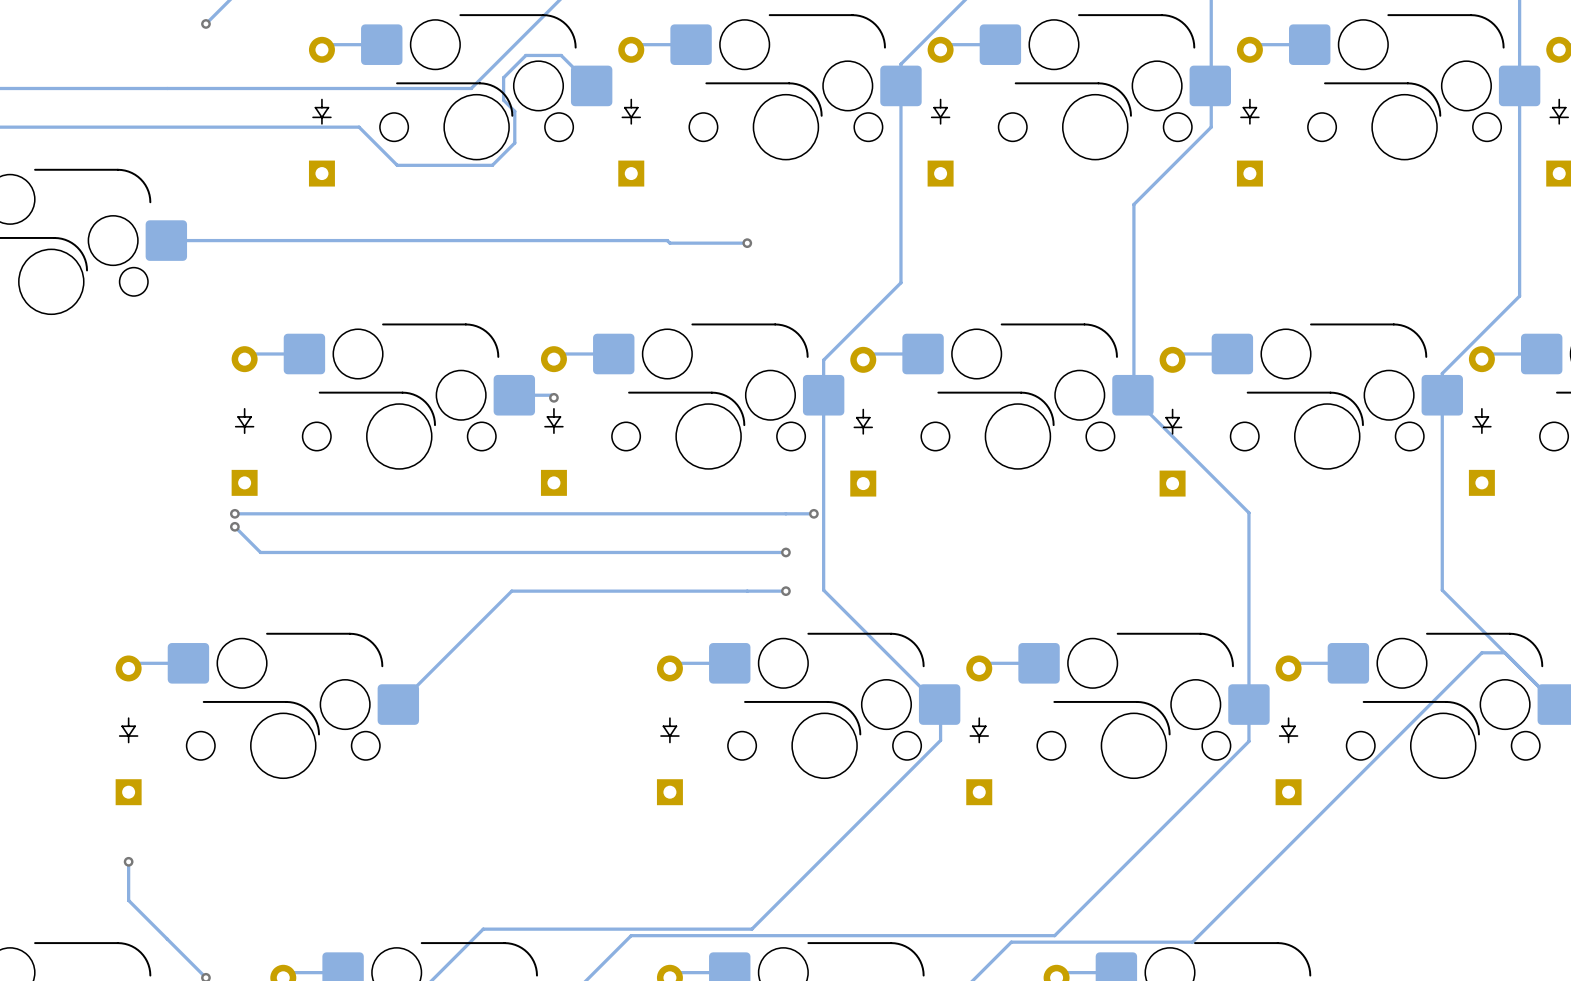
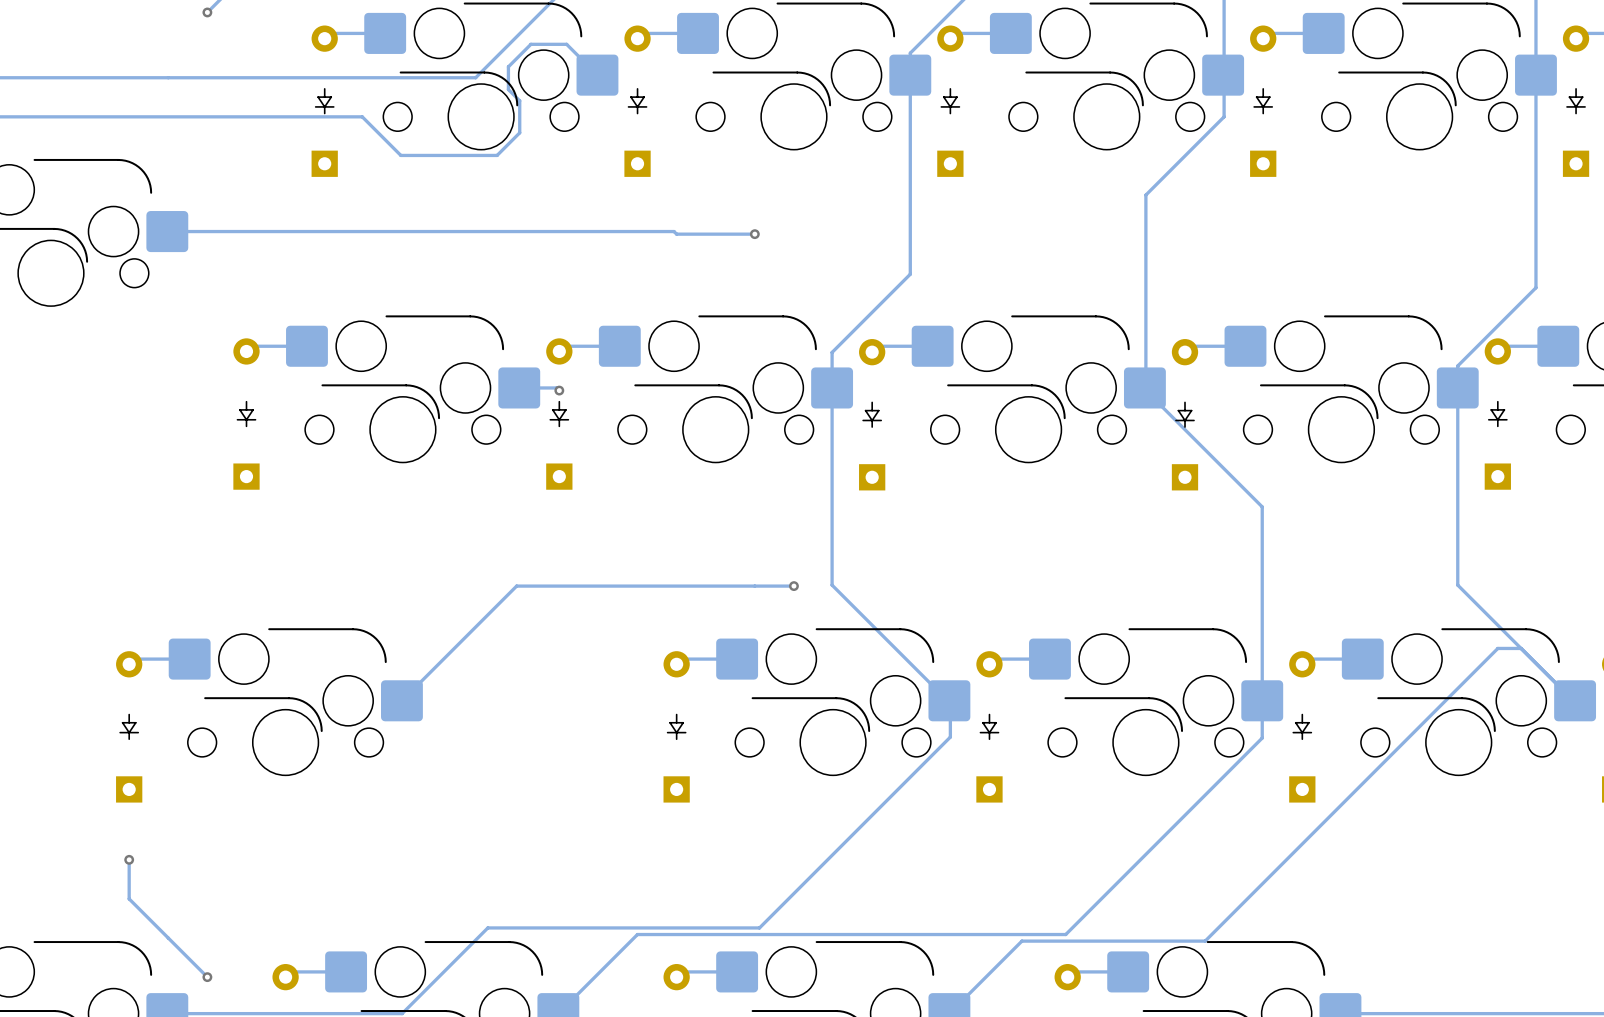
via: (234, 513) -> none
track: (813, 513) (234, 513) -> none
via: (813, 513) -> none
track: (234, 526) (260, 552) (785, 552) -> none
via: (234, 526) -> none
via: (785, 552) -> none

